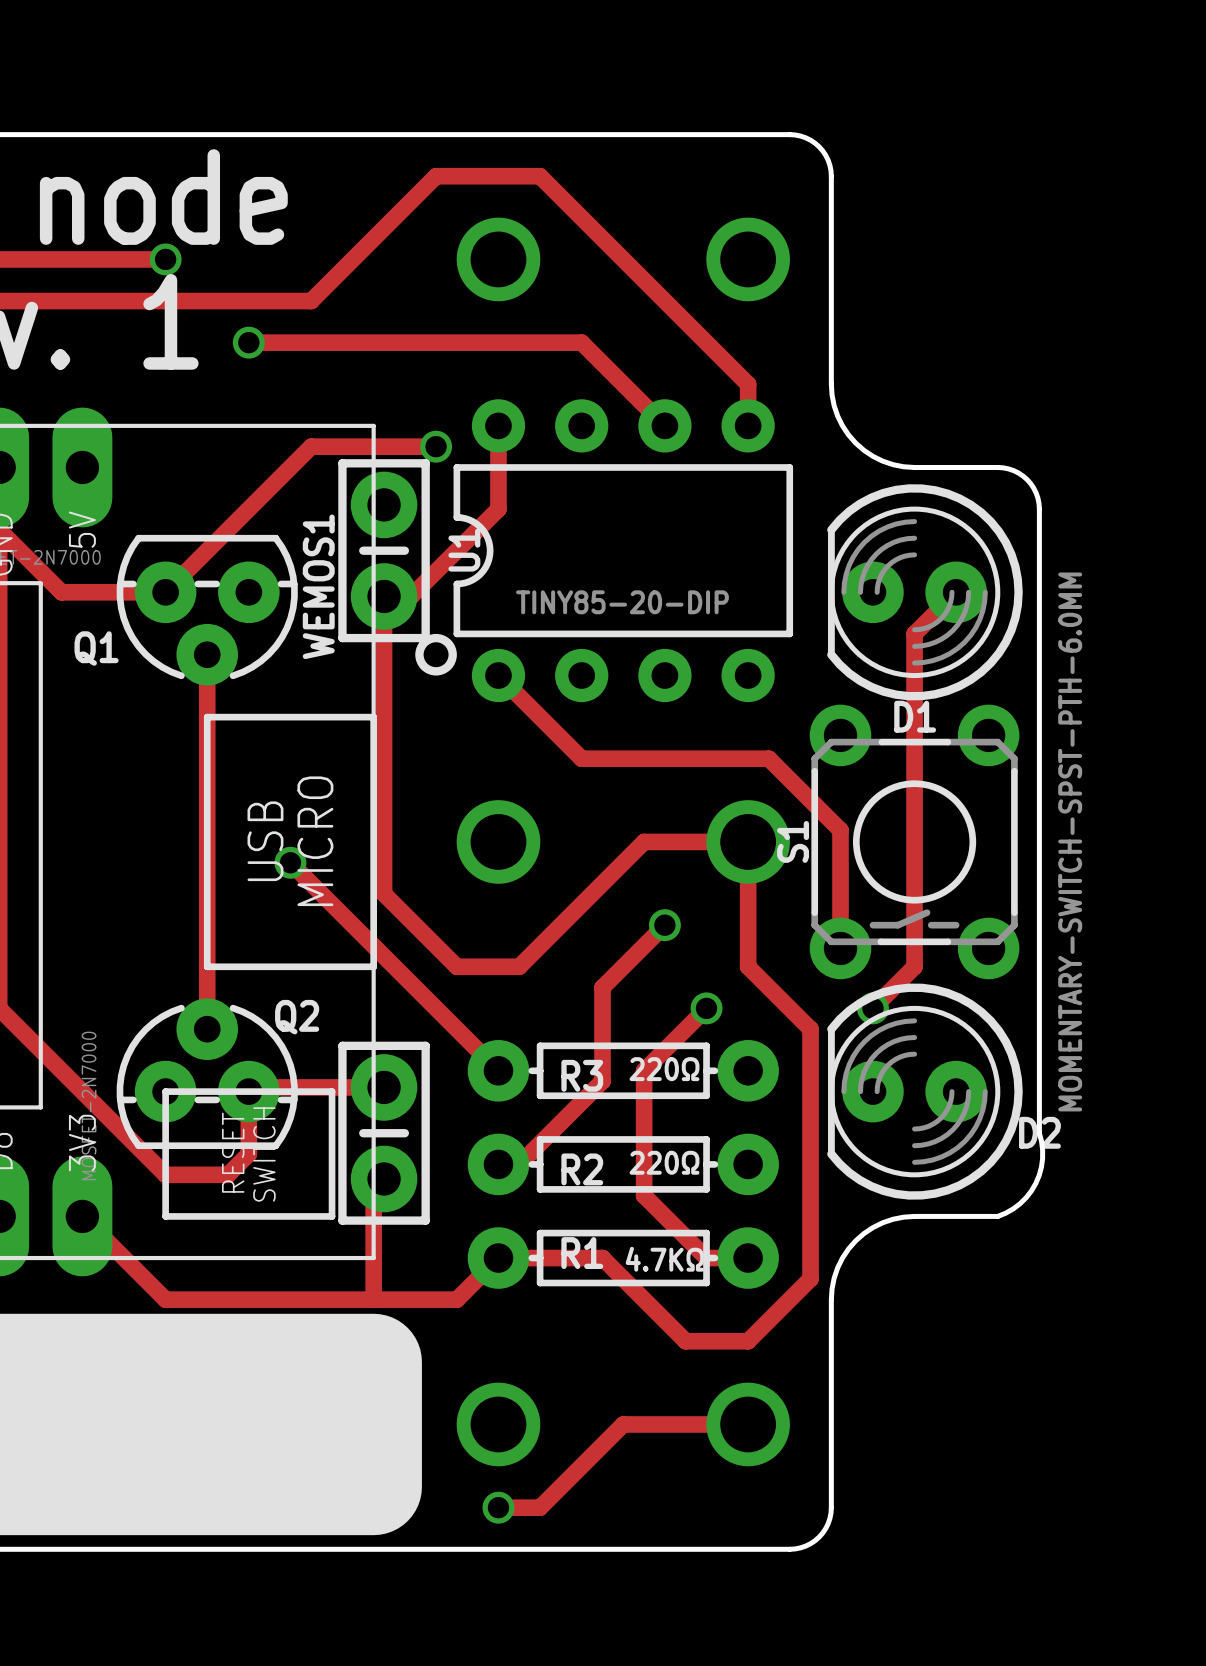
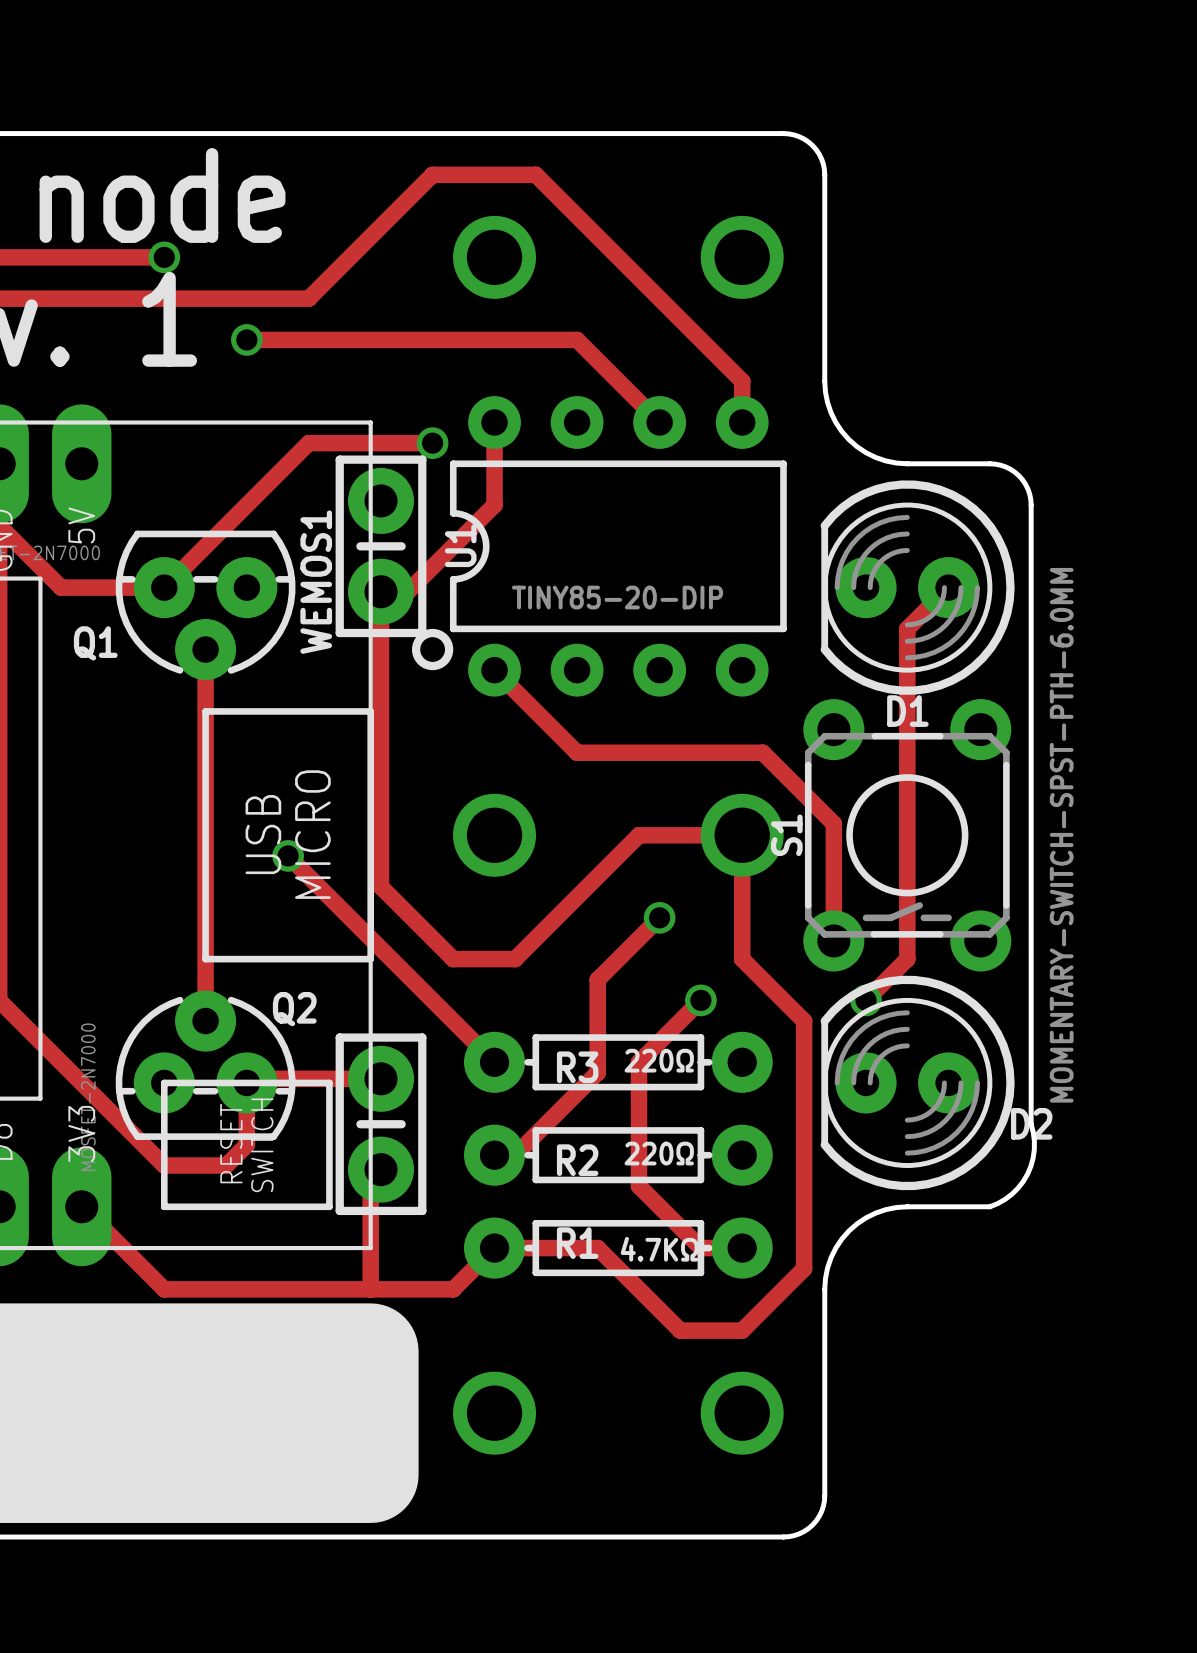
track: (748, 1424) (623, 1424) (540, 1507) (498, 1507) -> none
via: (498, 1507) -> none

